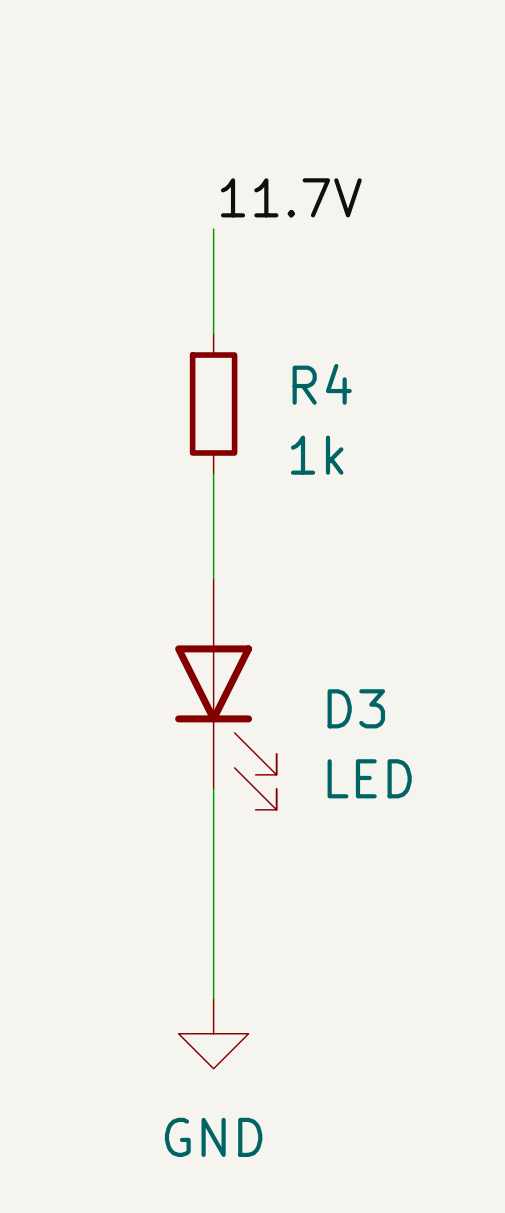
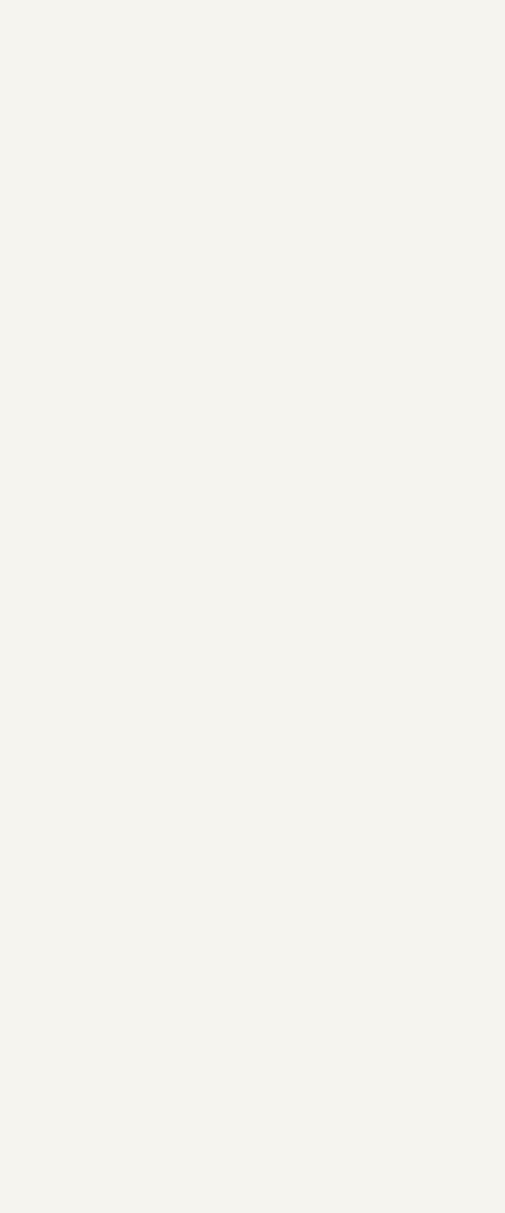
label: 11.7V (291, 197) -> none
wire: (213, 229) (213, 334) -> none
R4: 1k (213, 404) -> none
wire: (213, 473) (213, 578) -> none
D3: LED (225, 694) -> none
wire: (213, 788) (213, 998) -> none
power symbol: GND (213, 1033) -> none

